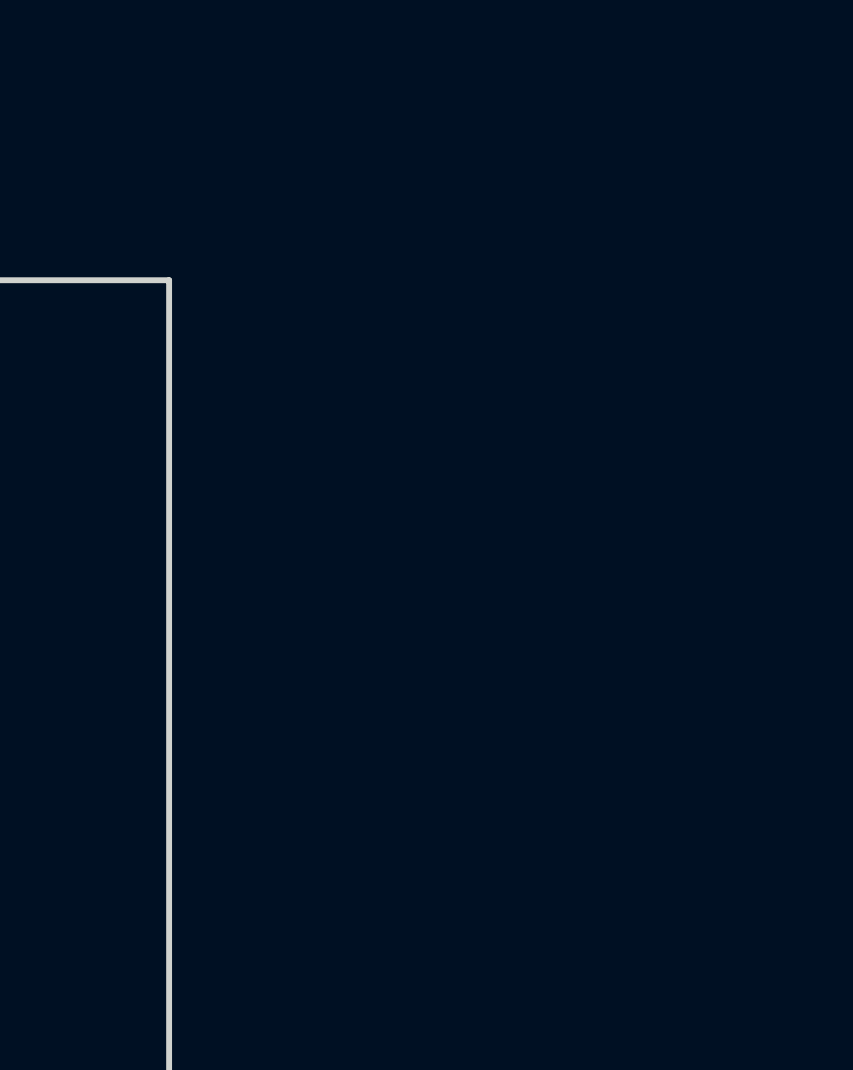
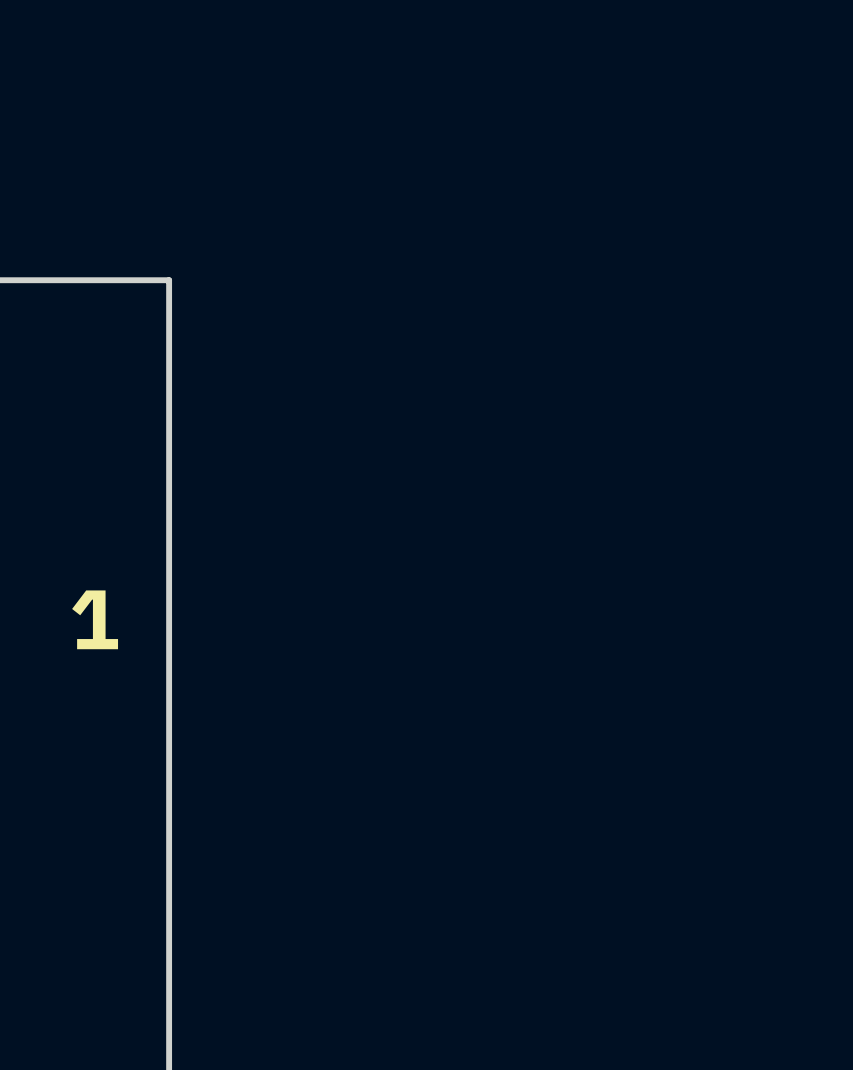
text: none -> 1 (95, 619)

